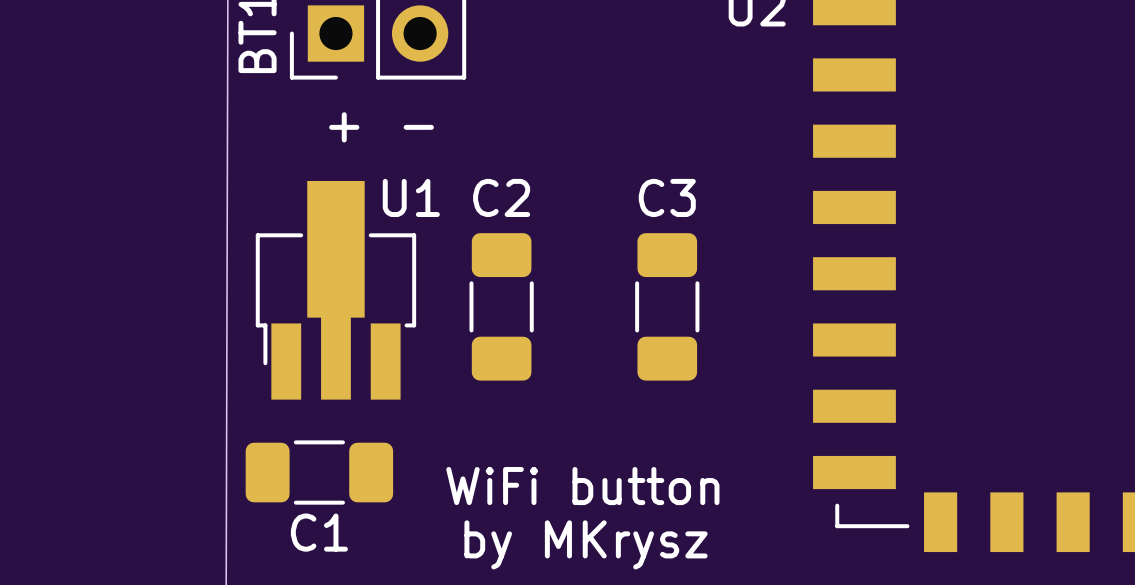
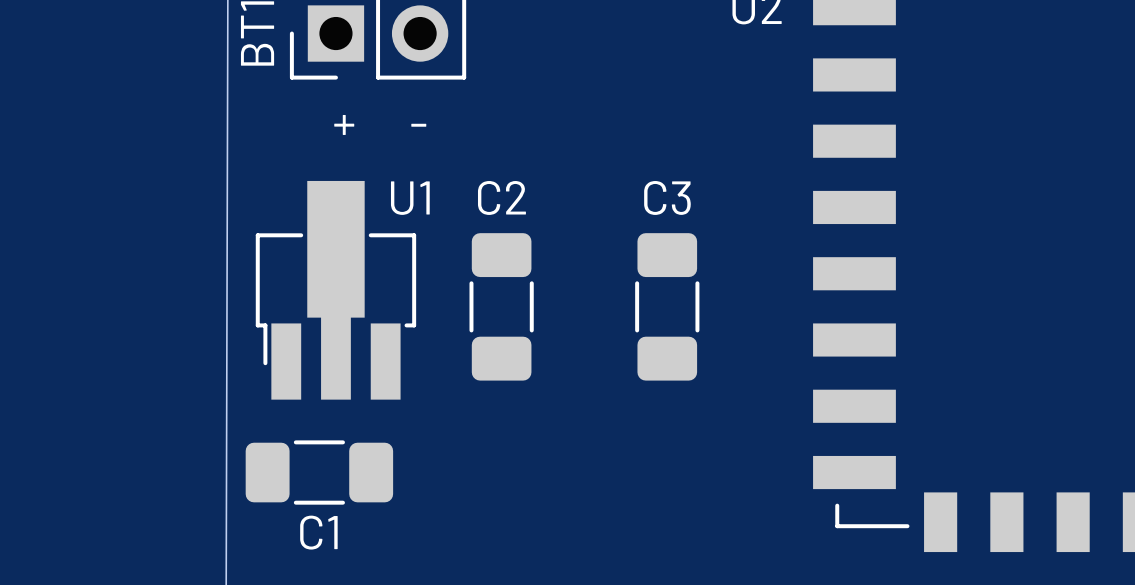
text: WiFi button (582, 486) -> none
text: by MKrysz (586, 544) -> none

